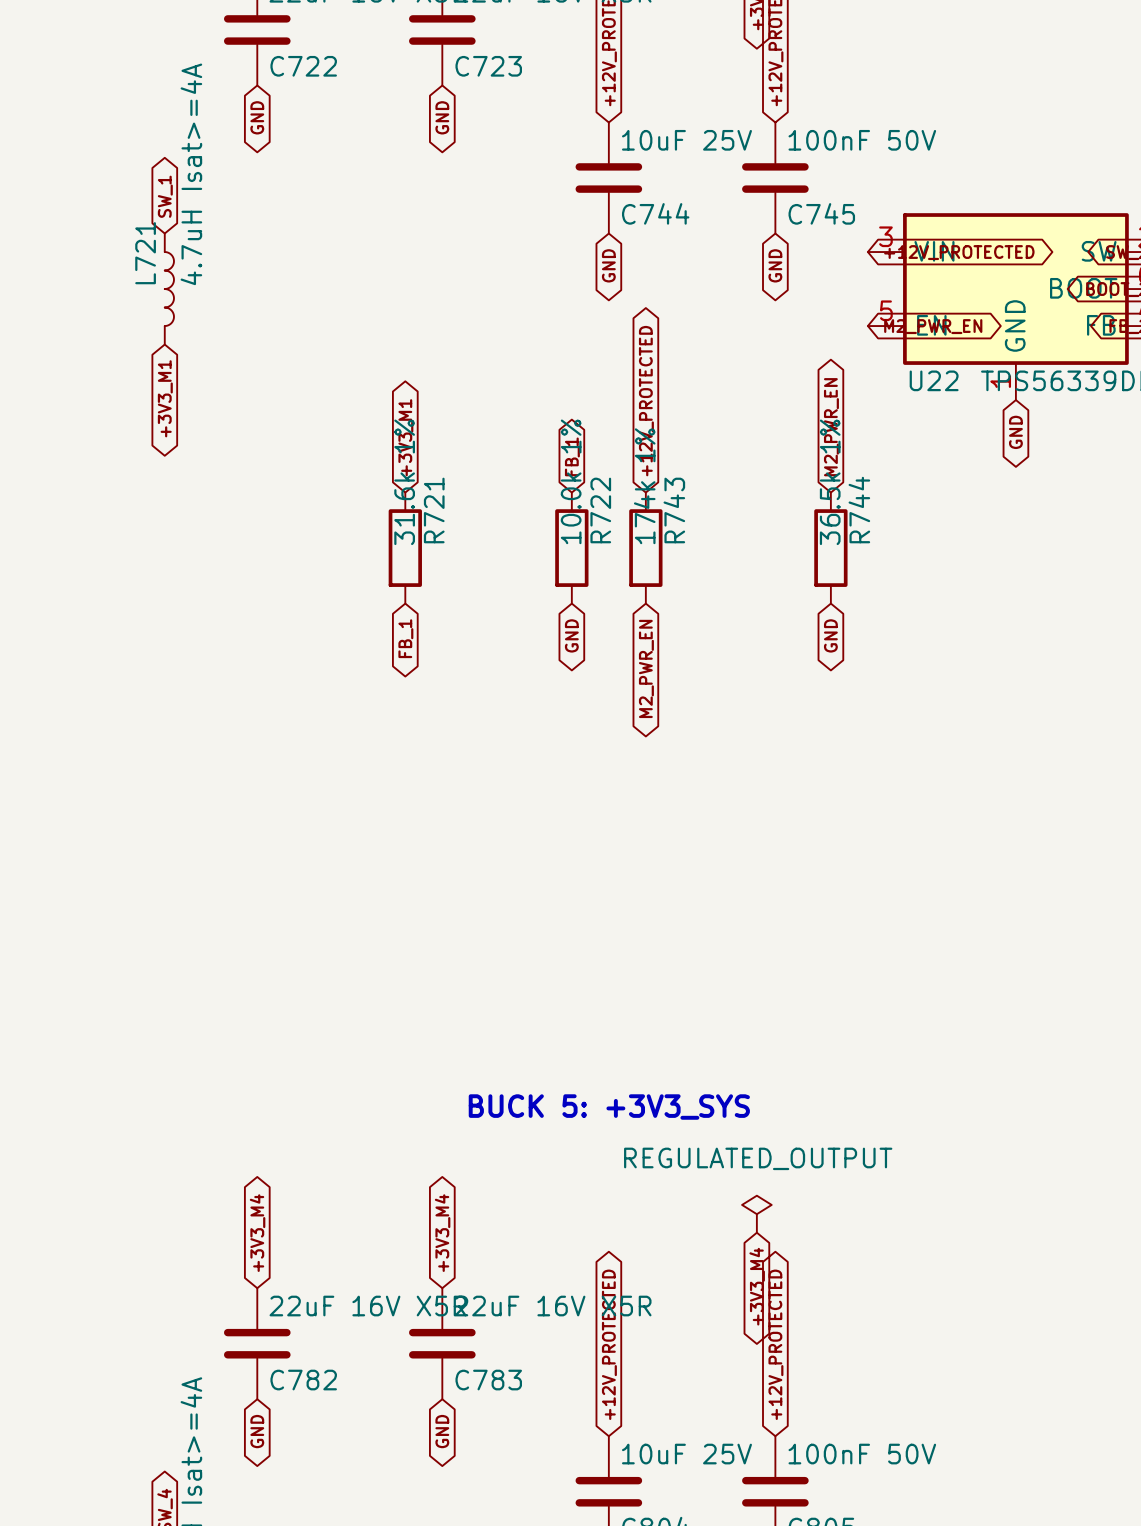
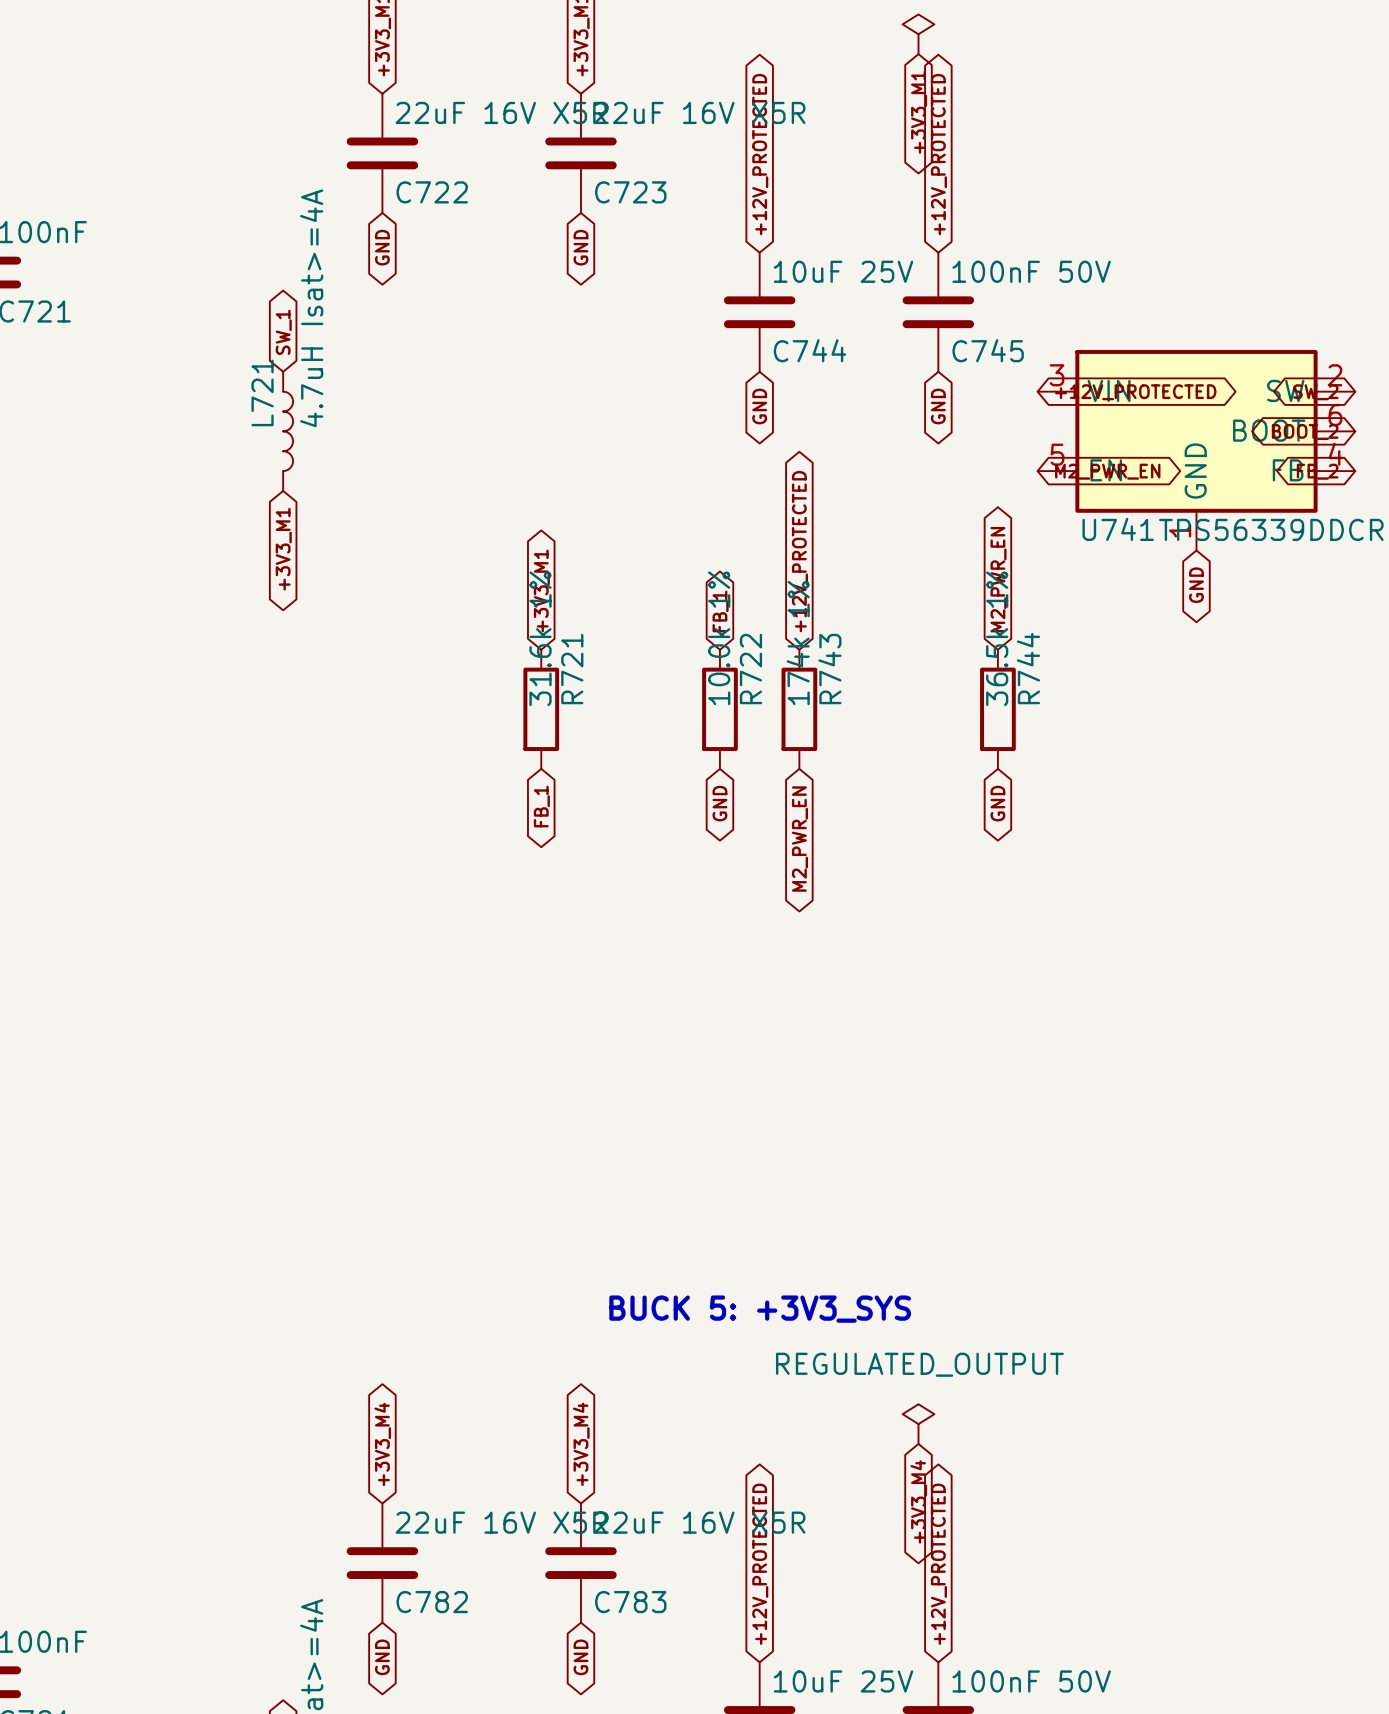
U22 name: U22 (934, 380) -> U741 (1118, 529)

